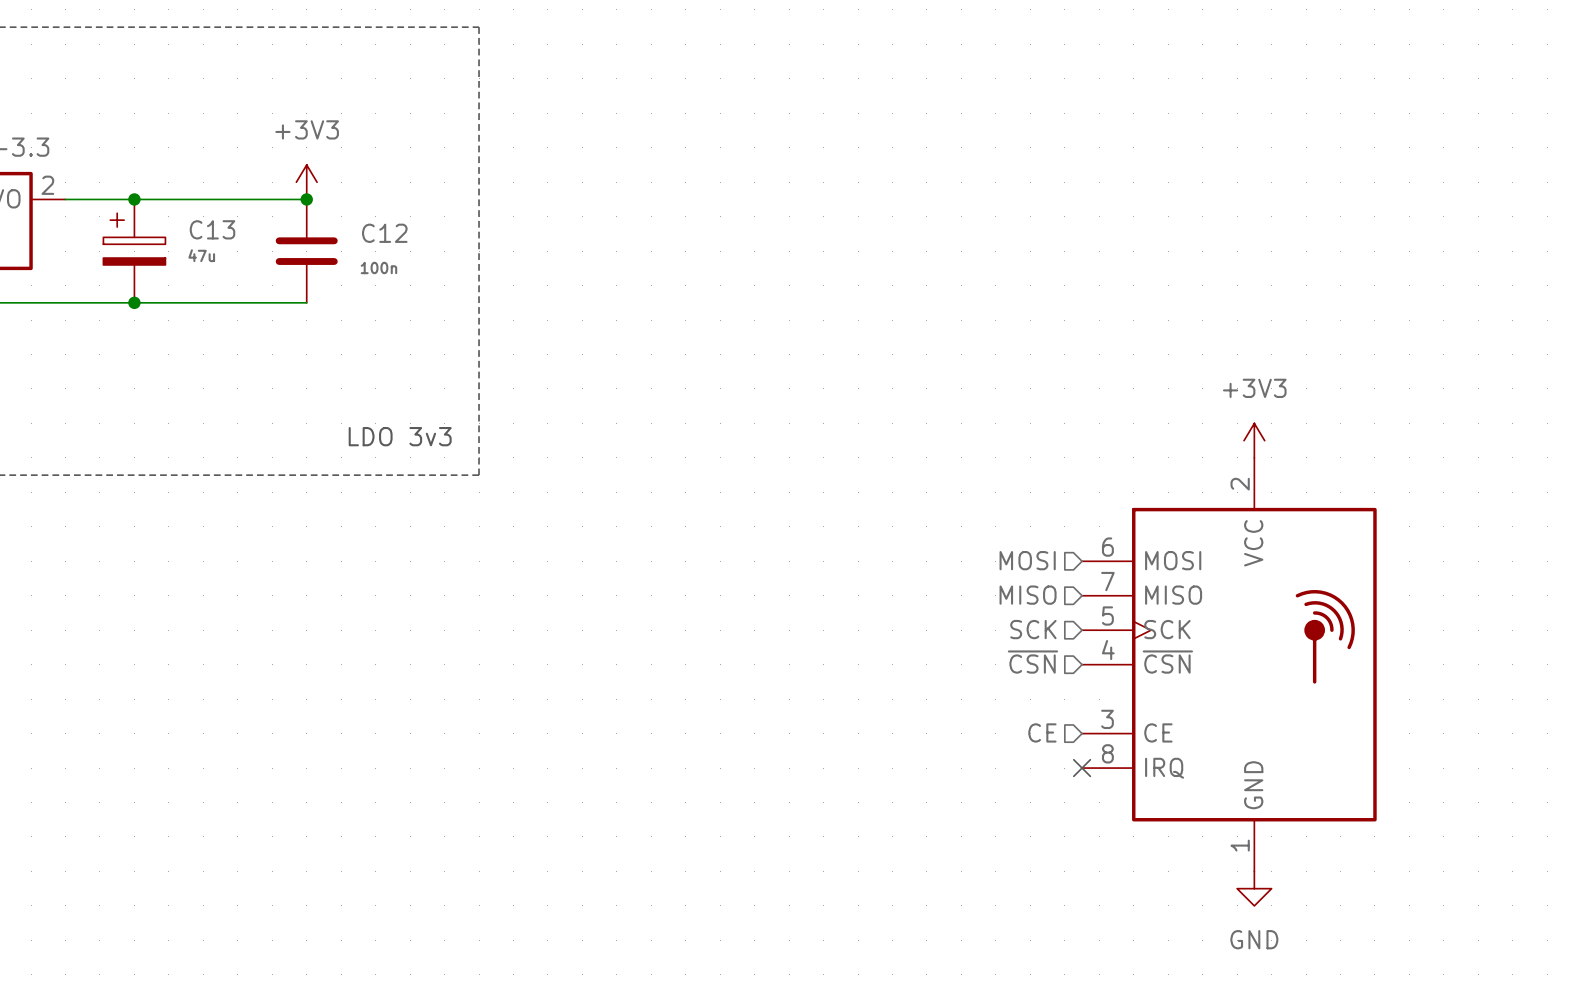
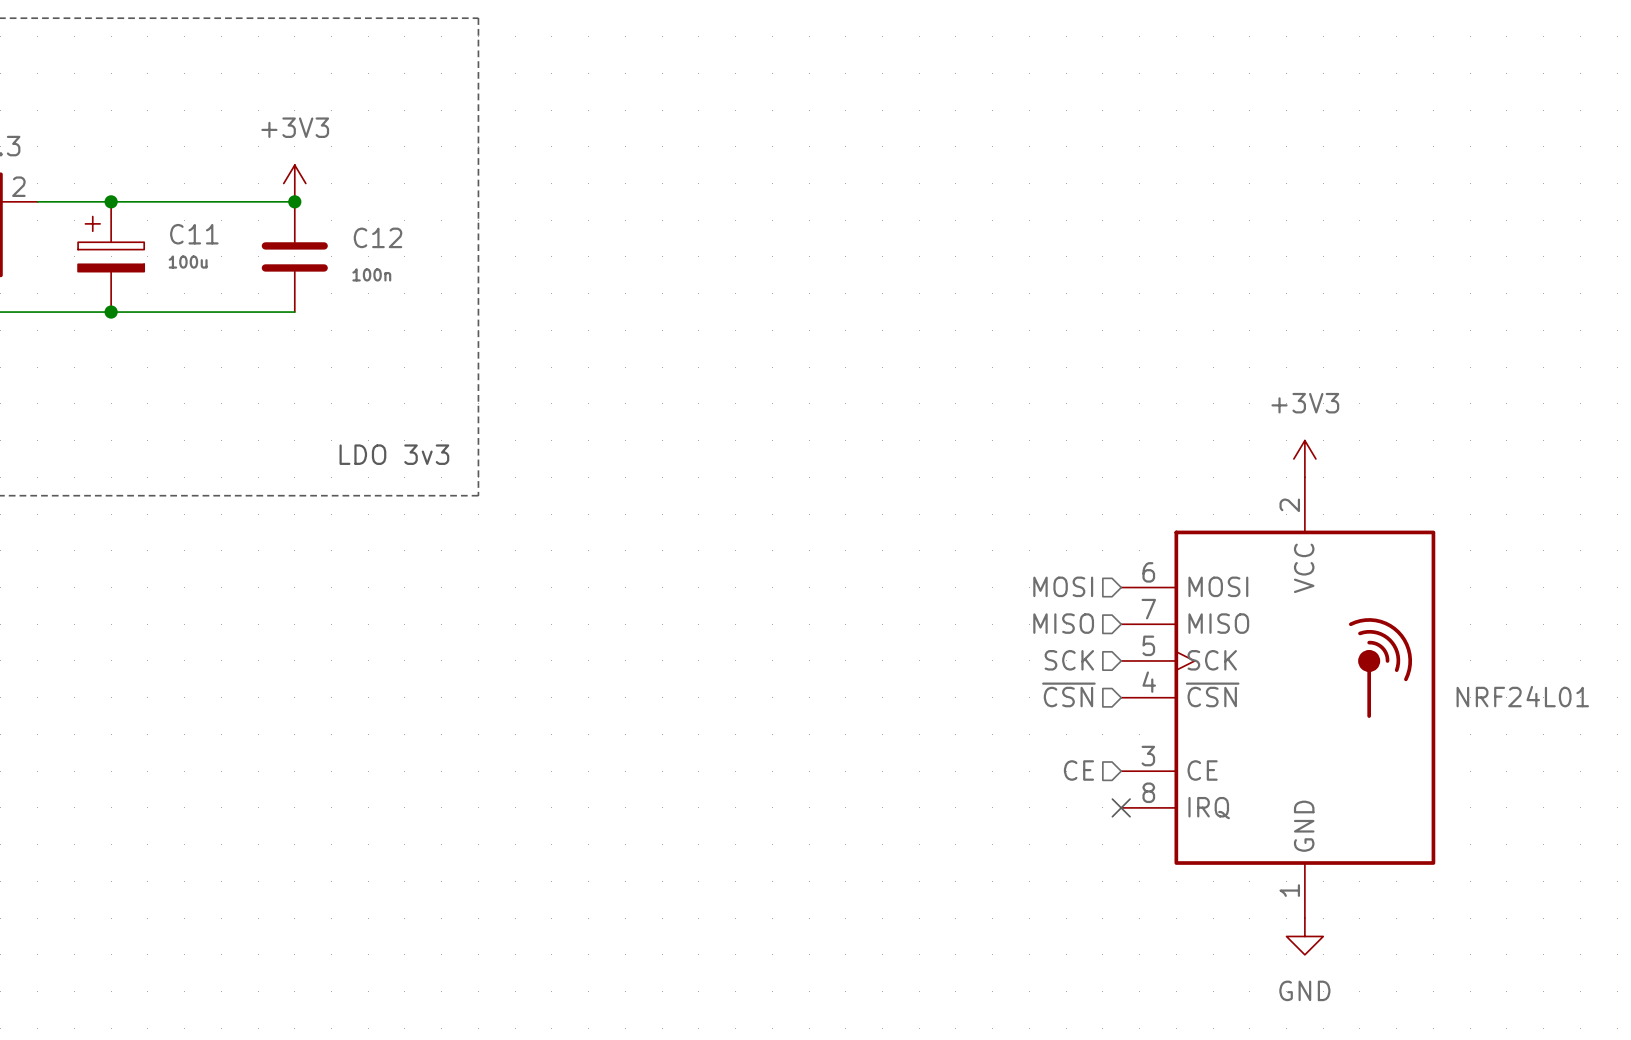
C13 name: C13 (212, 229) -> C11 (194, 234)
C13 value: 47u (201, 255) -> 100u (188, 262)
part value: none -> NRF24L01 (1522, 696)

